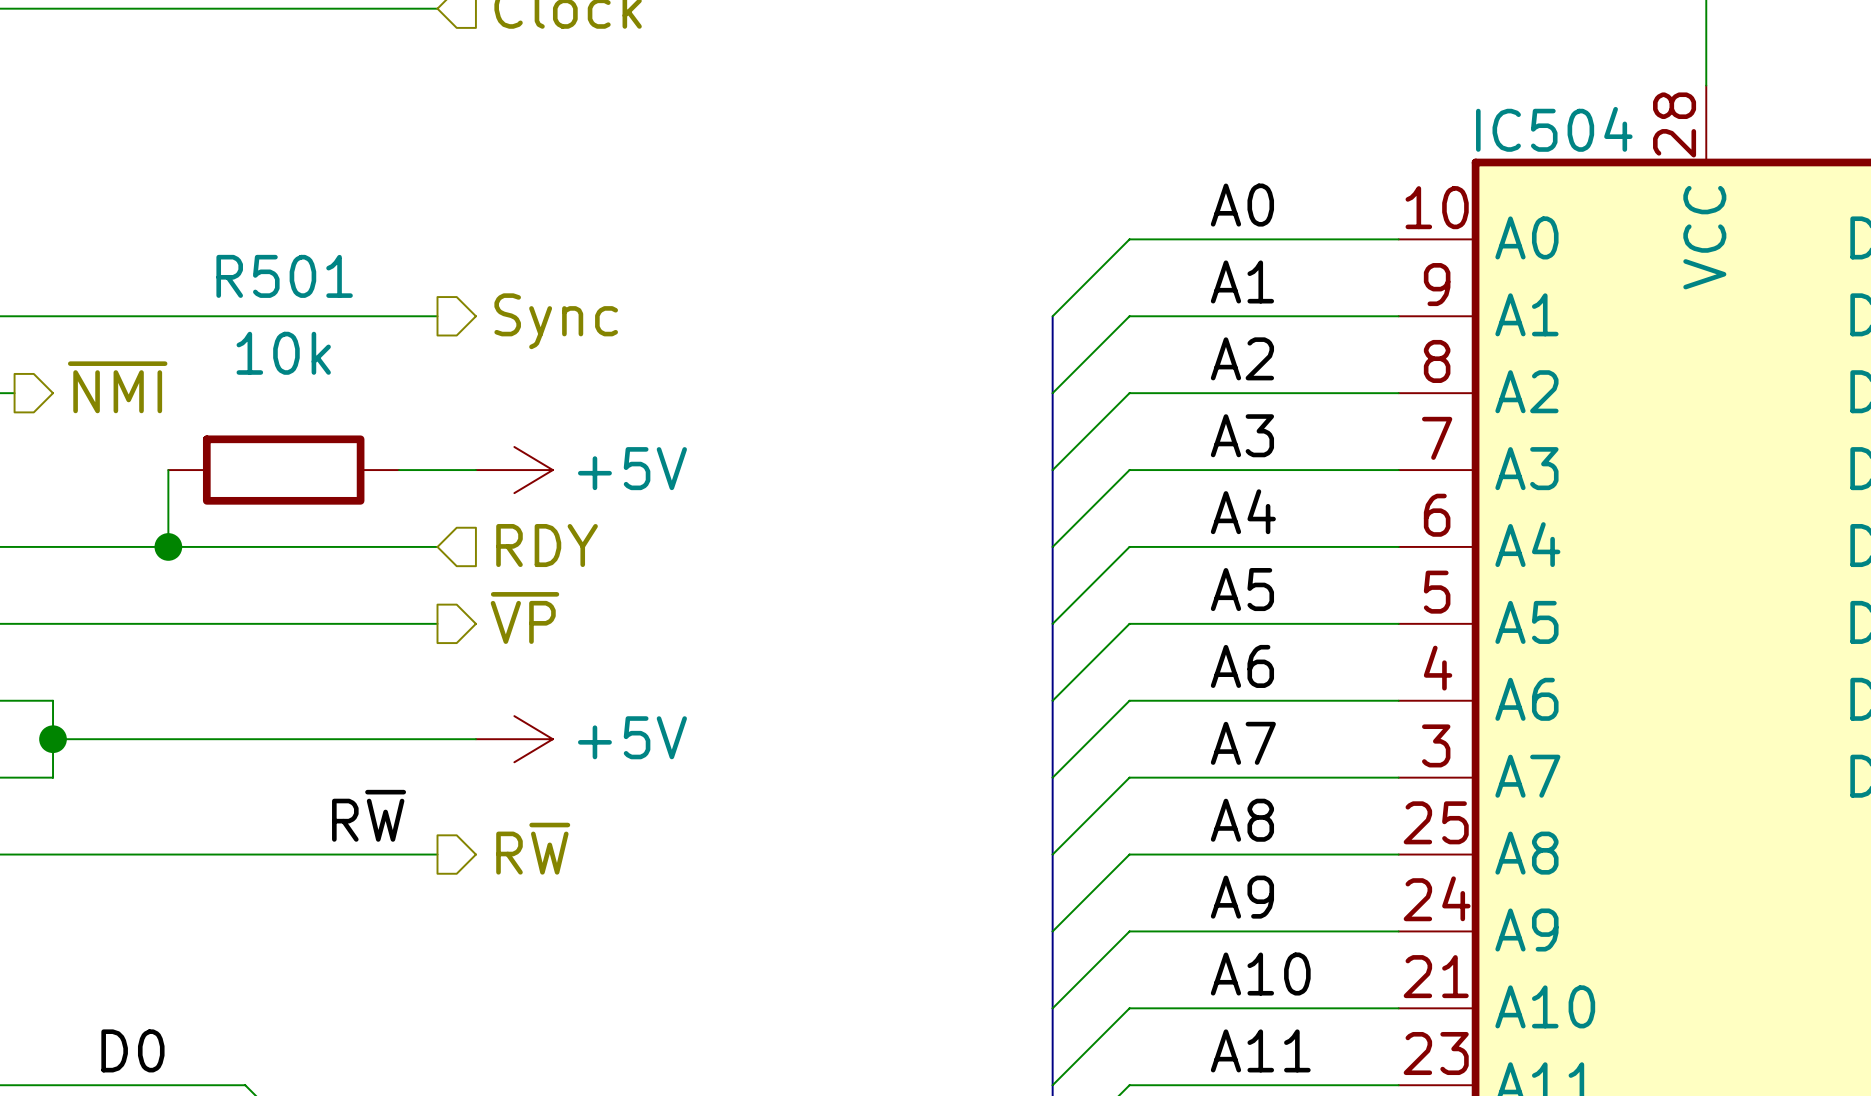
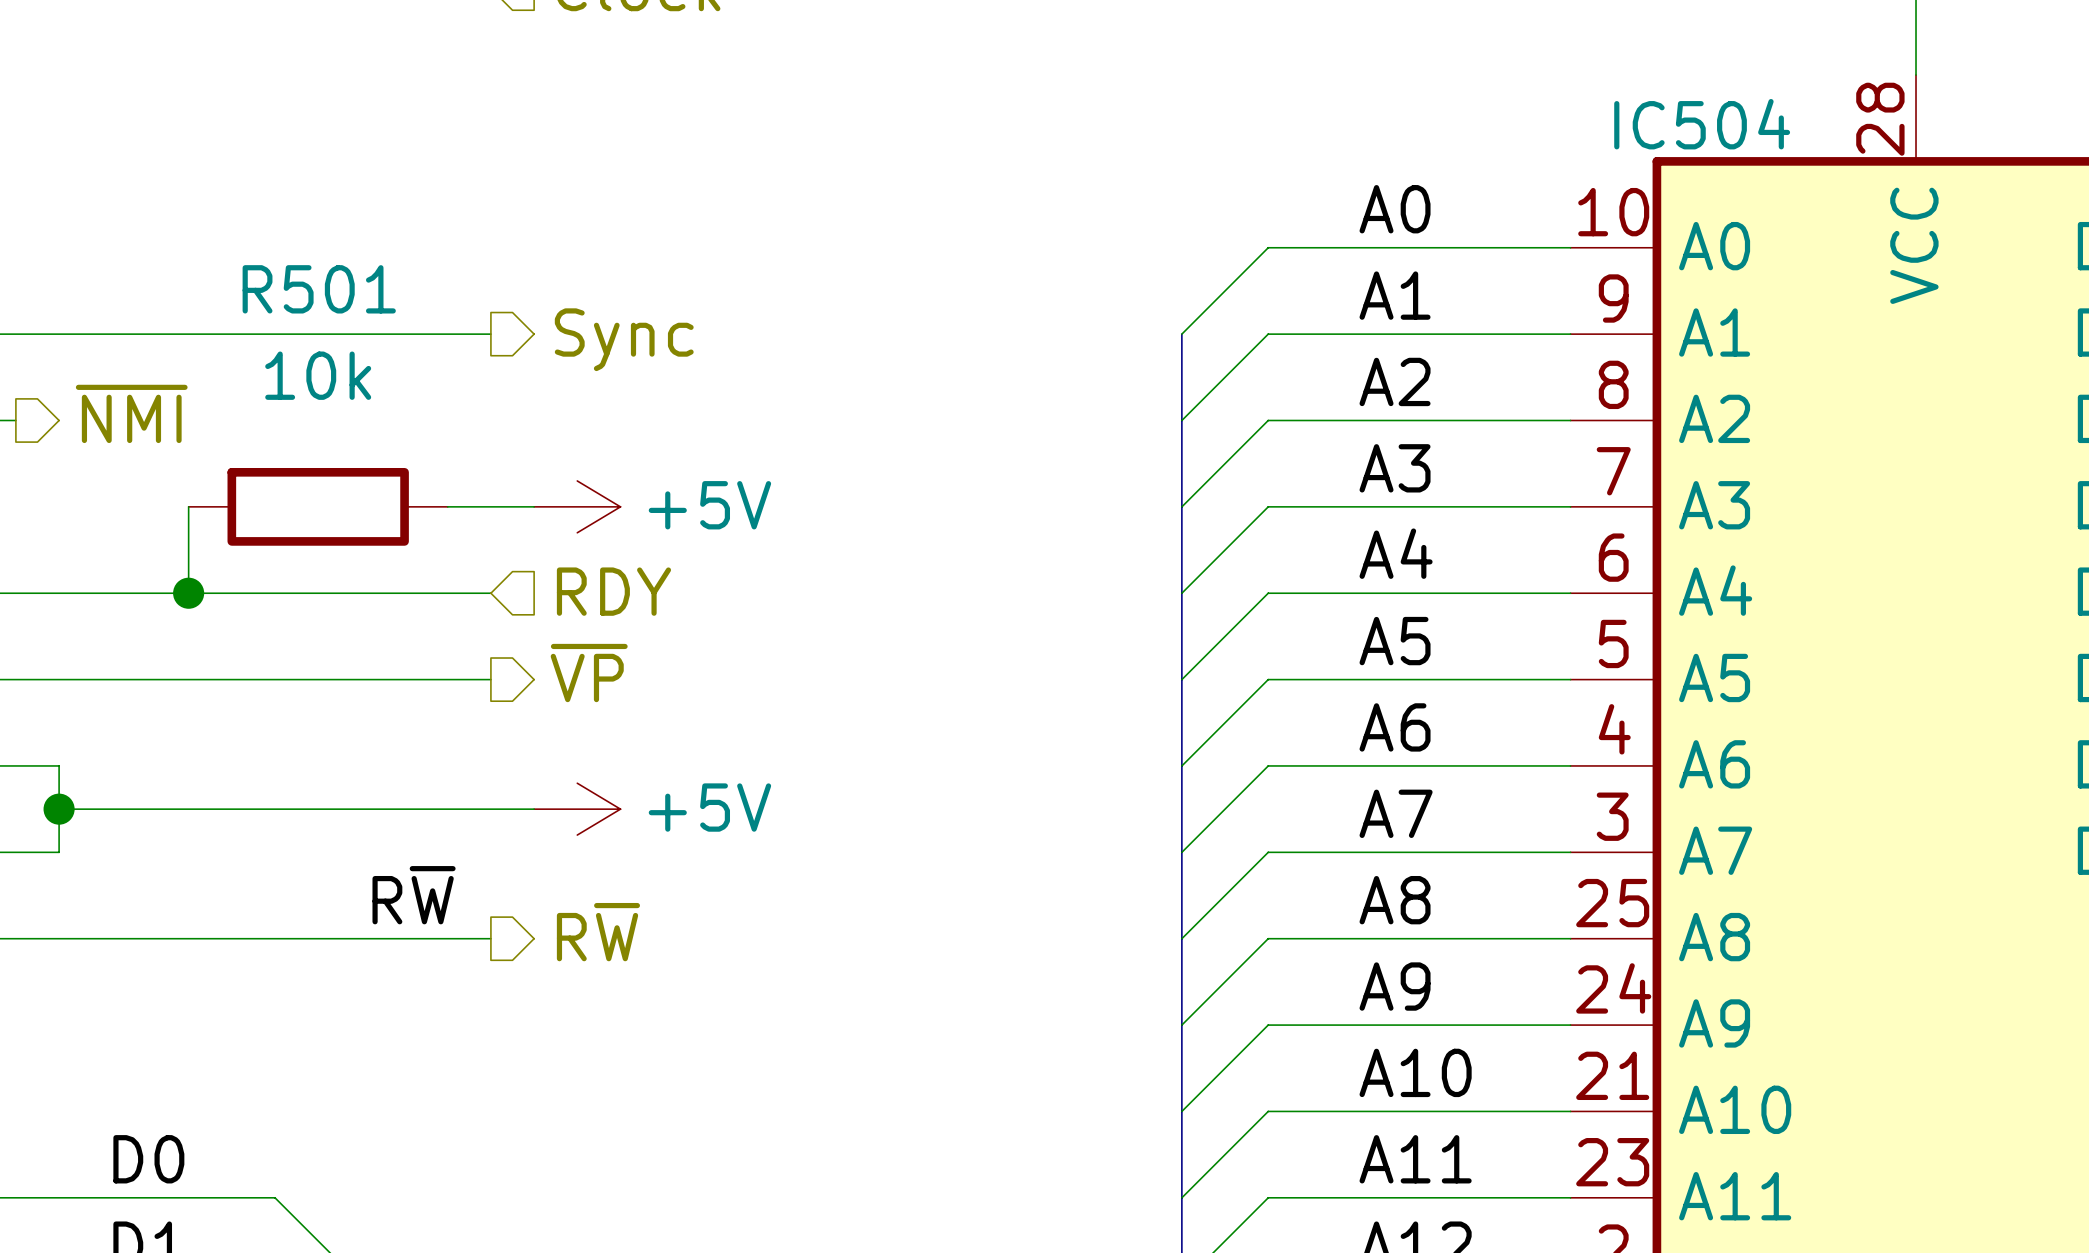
IC504 name position: IC504 (1554, 129) -> IC504 (1702, 124)

